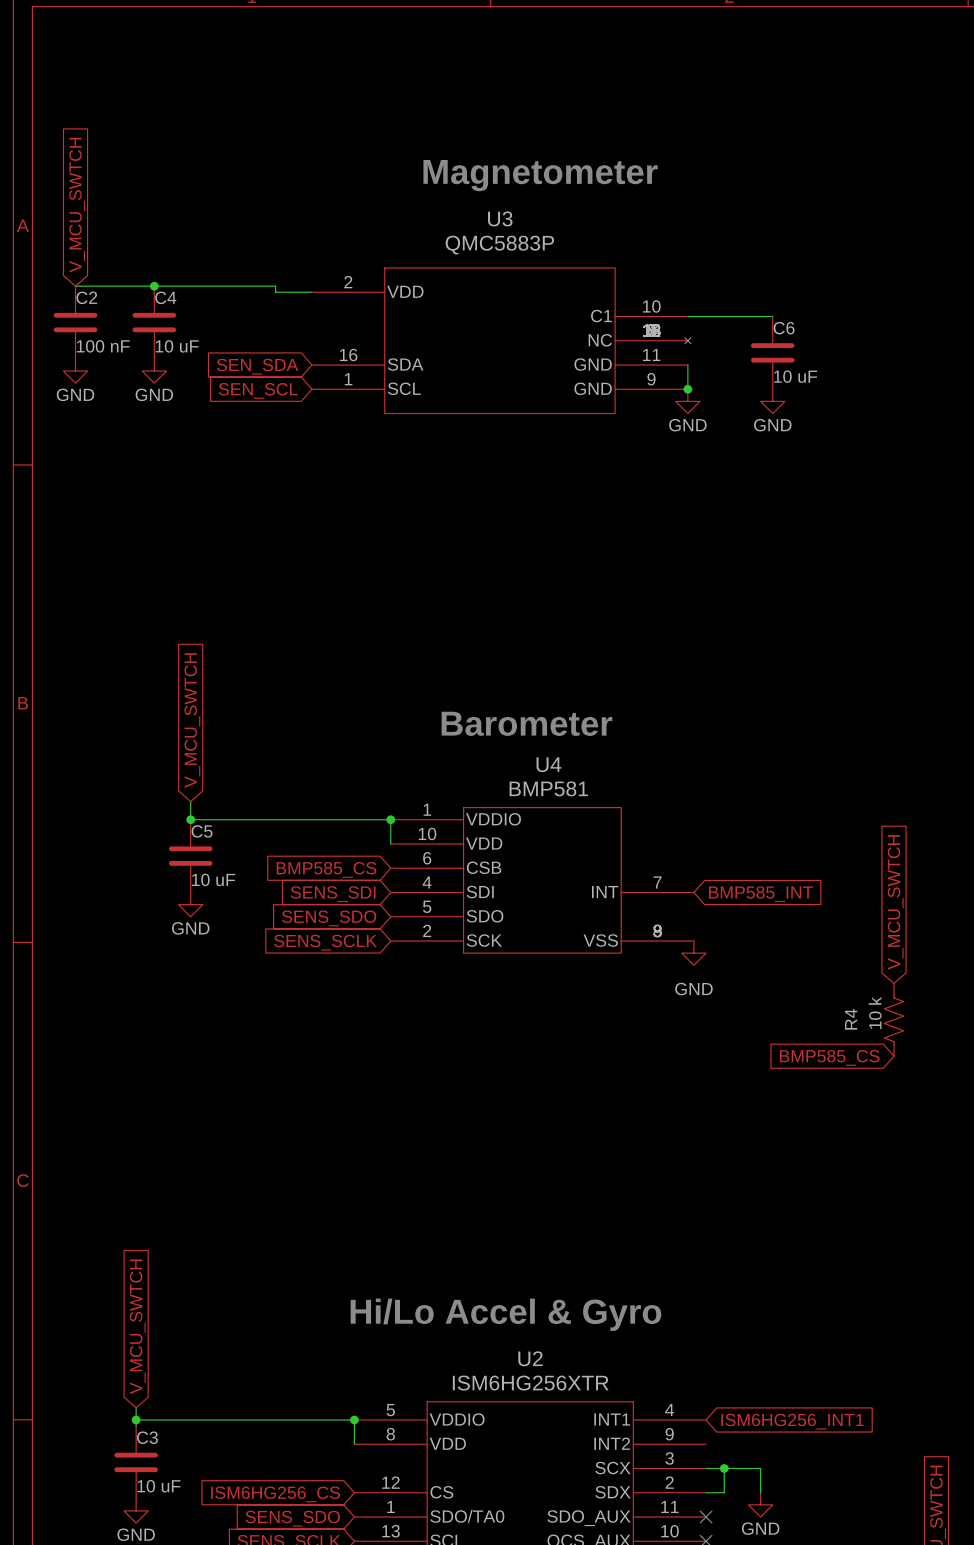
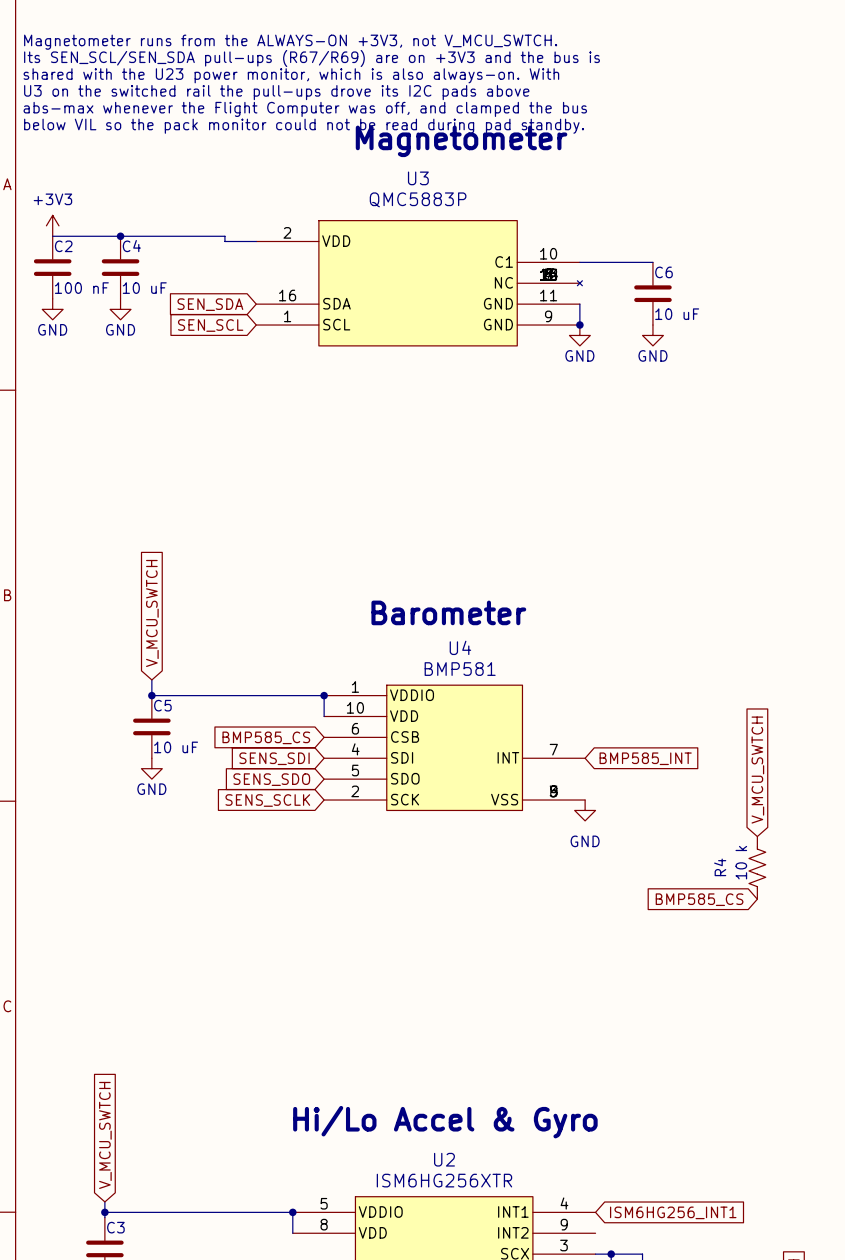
text: none -> Magnetometer runs from the ALWAYS-ON +3V3, not V_MCU_SWTCH. (290, 42)
text: none -> Its SEN_SCL/SEN_SDA pull-ups (R67/R69) are on +3V3 and the bus is (312, 58)
text: none -> shared with the U23 power monitor, which is also always-on. With (291, 75)
text: none -> U3 on the switched rail the pull-ups drove its I2C pads above (276, 92)
text: none -> abs-max whenever the Flight Computer was off, and clamped the bus (305, 109)
text: none -> below VIL so the pack monitor could not be read during pad standby. (304, 126)
global label: V_MCU_SWTCH (77, 205) -> none
power symbol: none -> +3V3 (52, 225)

